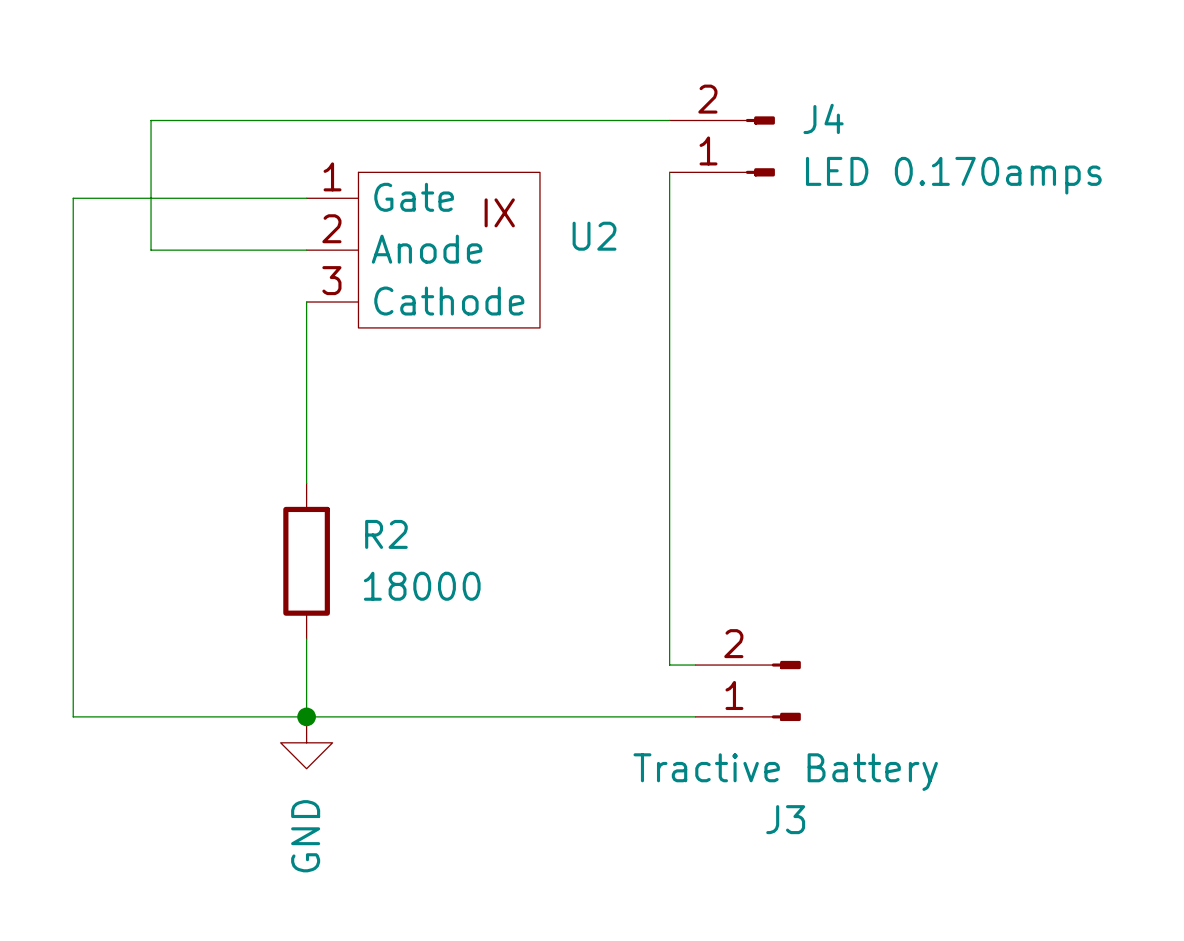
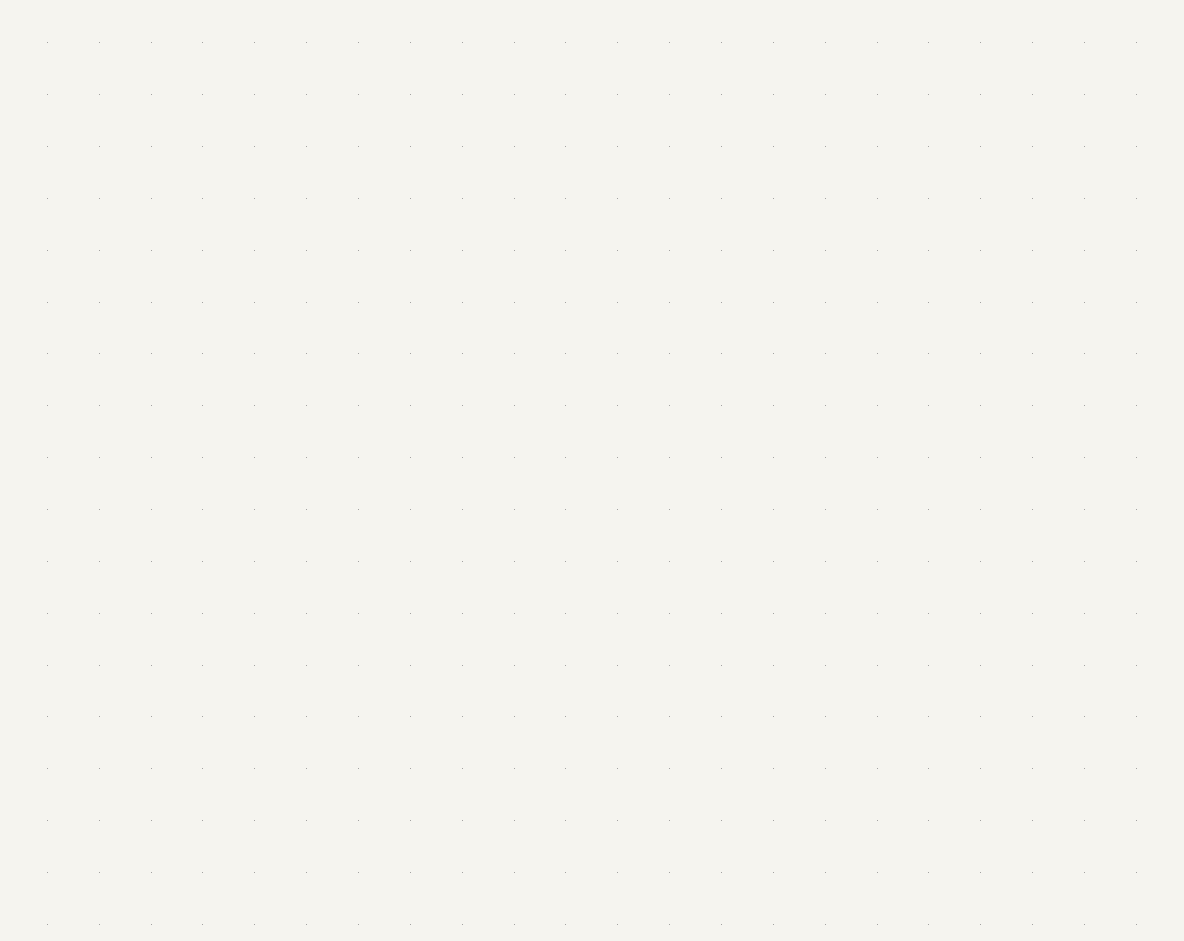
wire: (669, 120) (151, 120) (151, 250) (306, 250) -> none
J4: LED 0.170amps (722, 146) -> none
wire: (669, 172) (669, 665) (695, 665) -> none
wire: (306, 198) (73, 198) (73, 716) (695, 716) -> none
U2: (423, 263) -> none
wire: (306, 302) (306, 483) -> none
R2: 18000 (306, 561) -> none
wire: (306, 639) (306, 716) -> none
J3: Tractive Battery (748, 690) -> none
junction: (306, 716) -> none
power symbol: GND (306, 742) -> none

